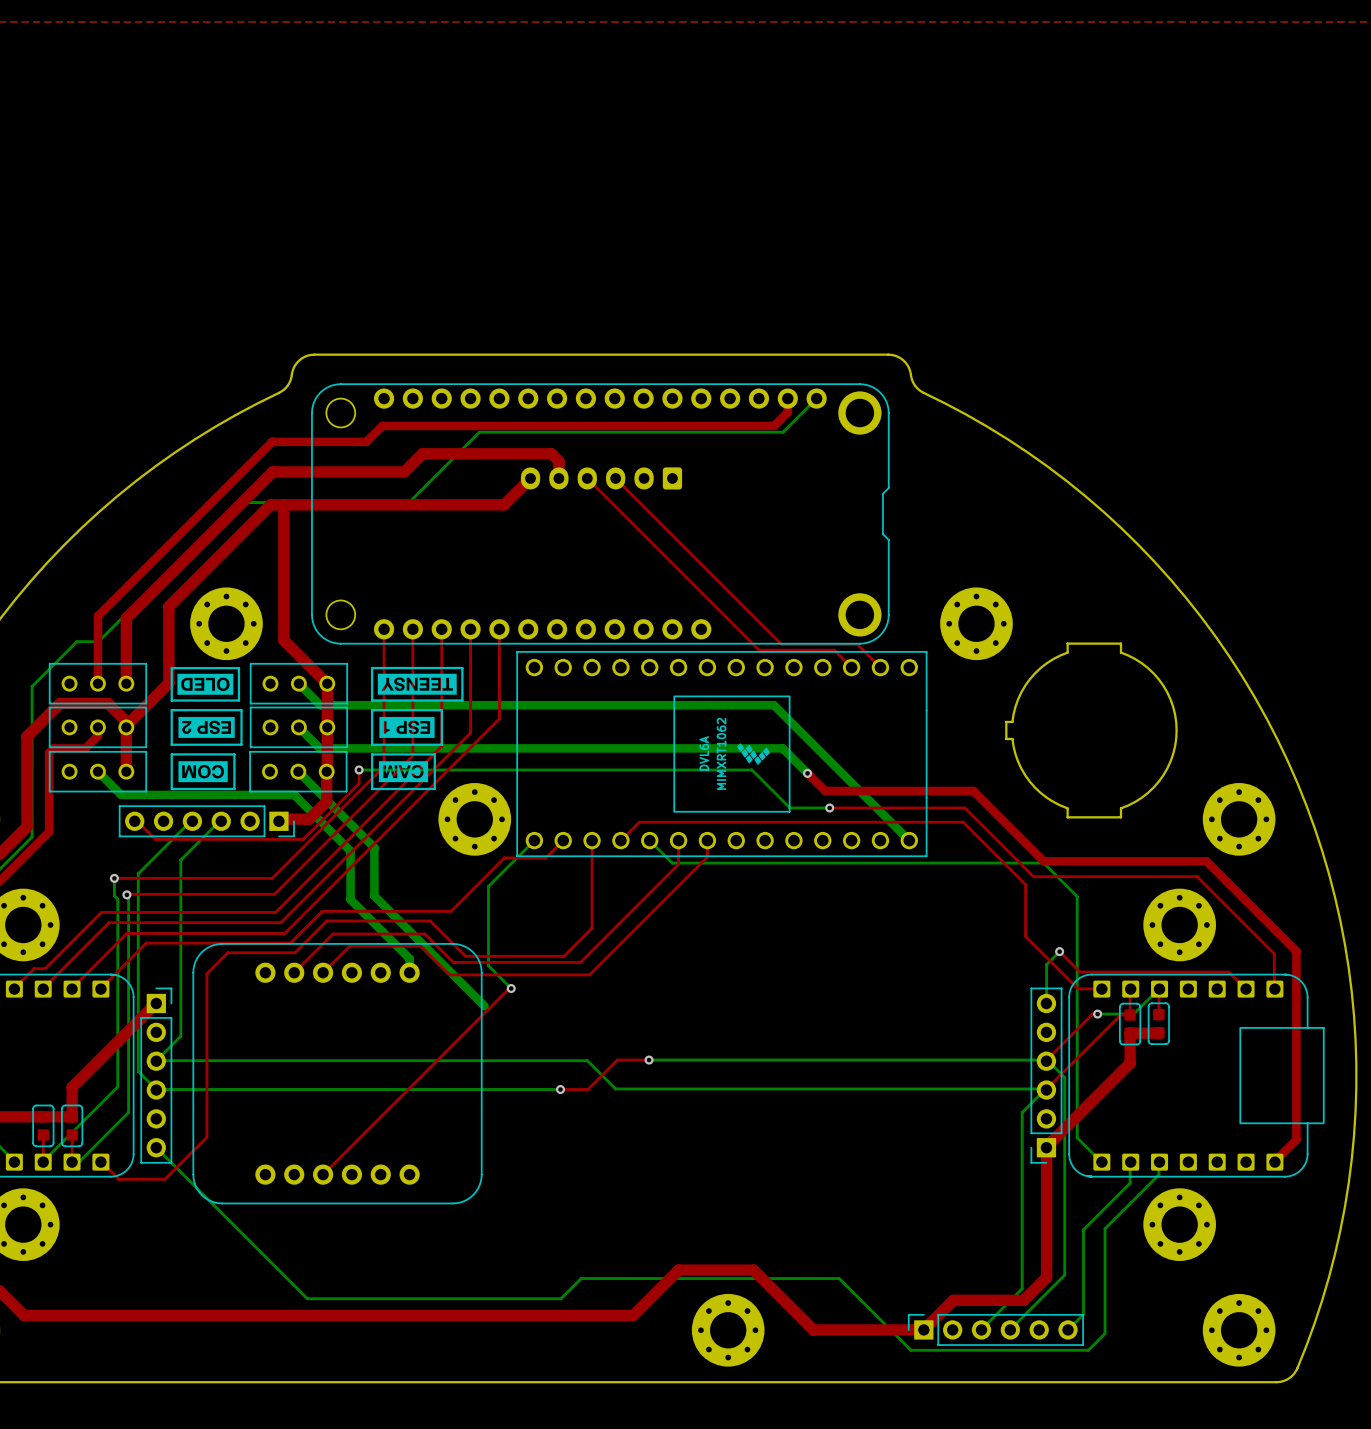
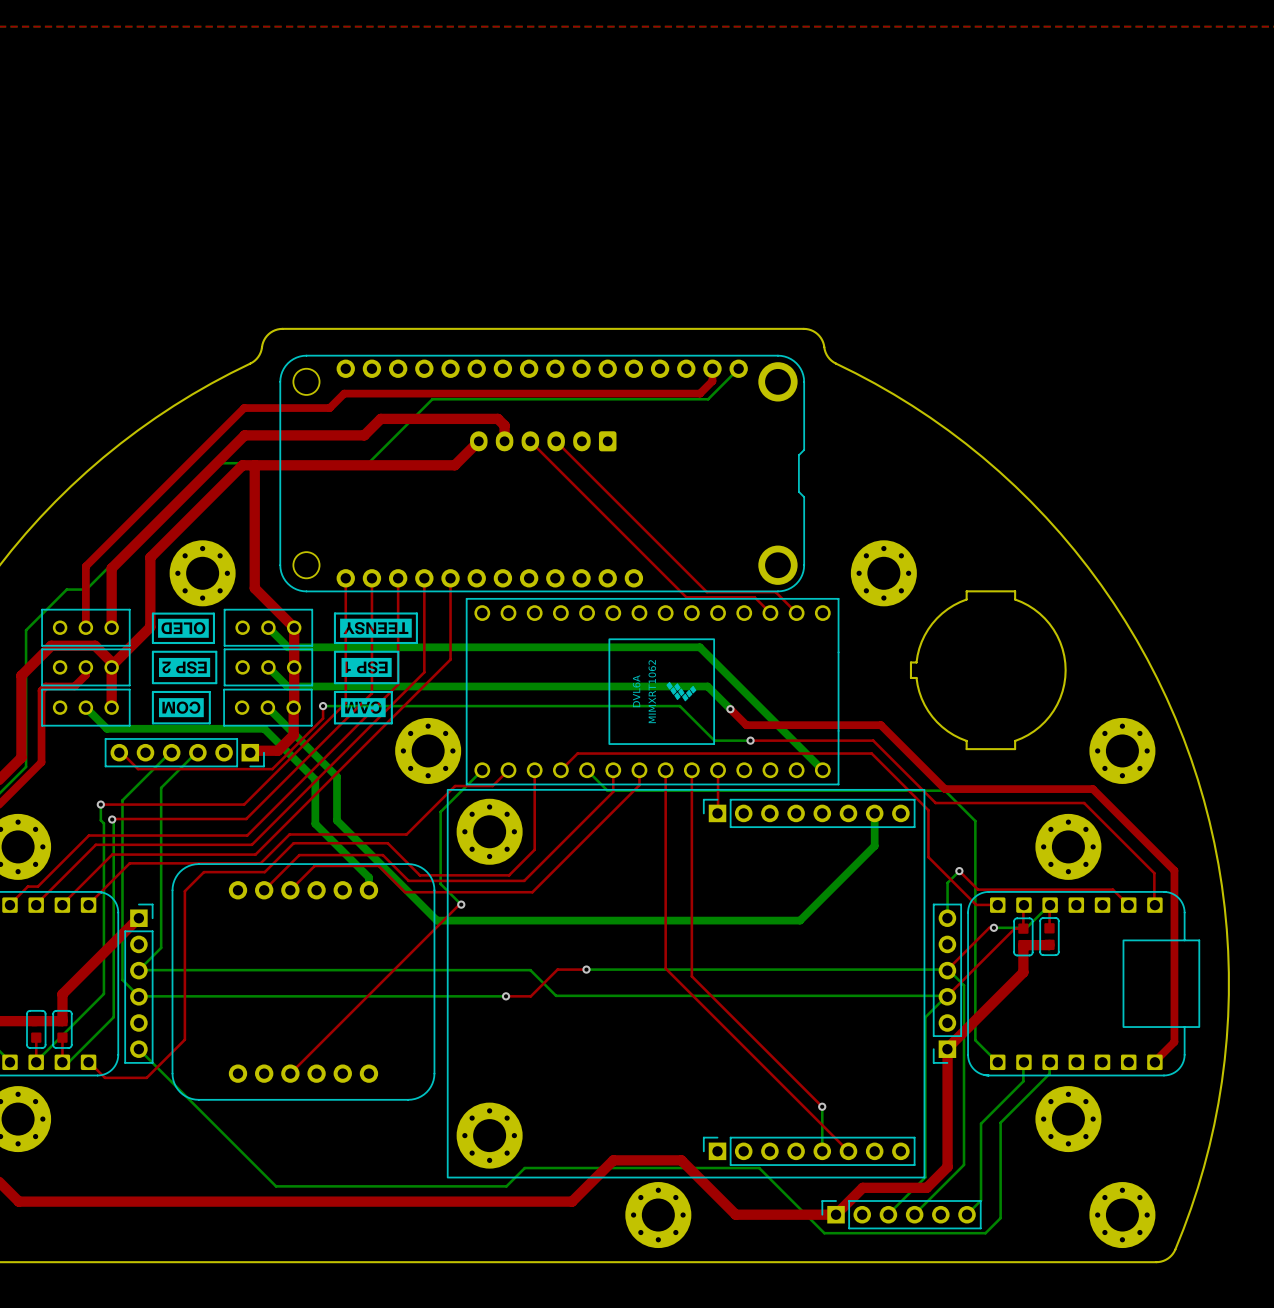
top track: none -> (665, 770) (665, 968) (848, 1151)
top track: none -> (691, 770) (691, 976) (822, 1106)
top track: none -> (718, 770) (718, 812)
bottom track: none -> (874, 813) (874, 845) (800, 920) (437, 920)
part: none -> (686, 983)
bottom track: none -> (822, 1106) (822, 1151)
via: none -> (822, 1106)

